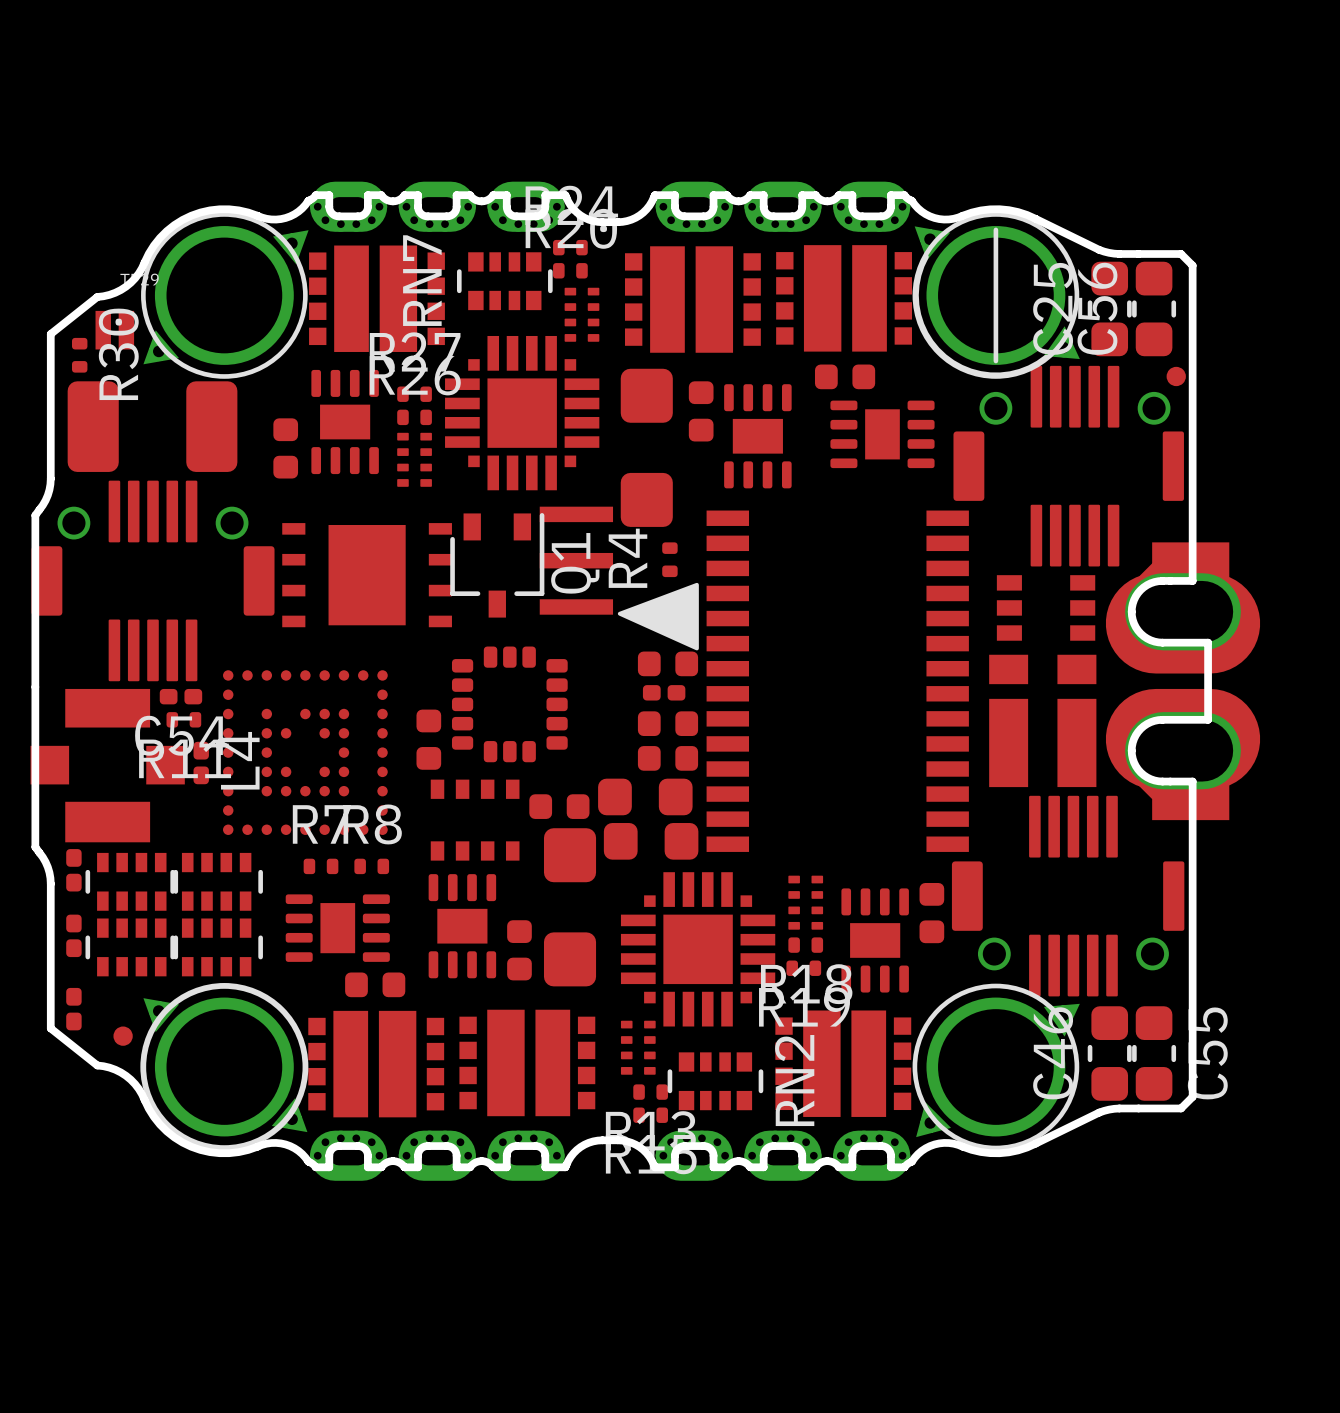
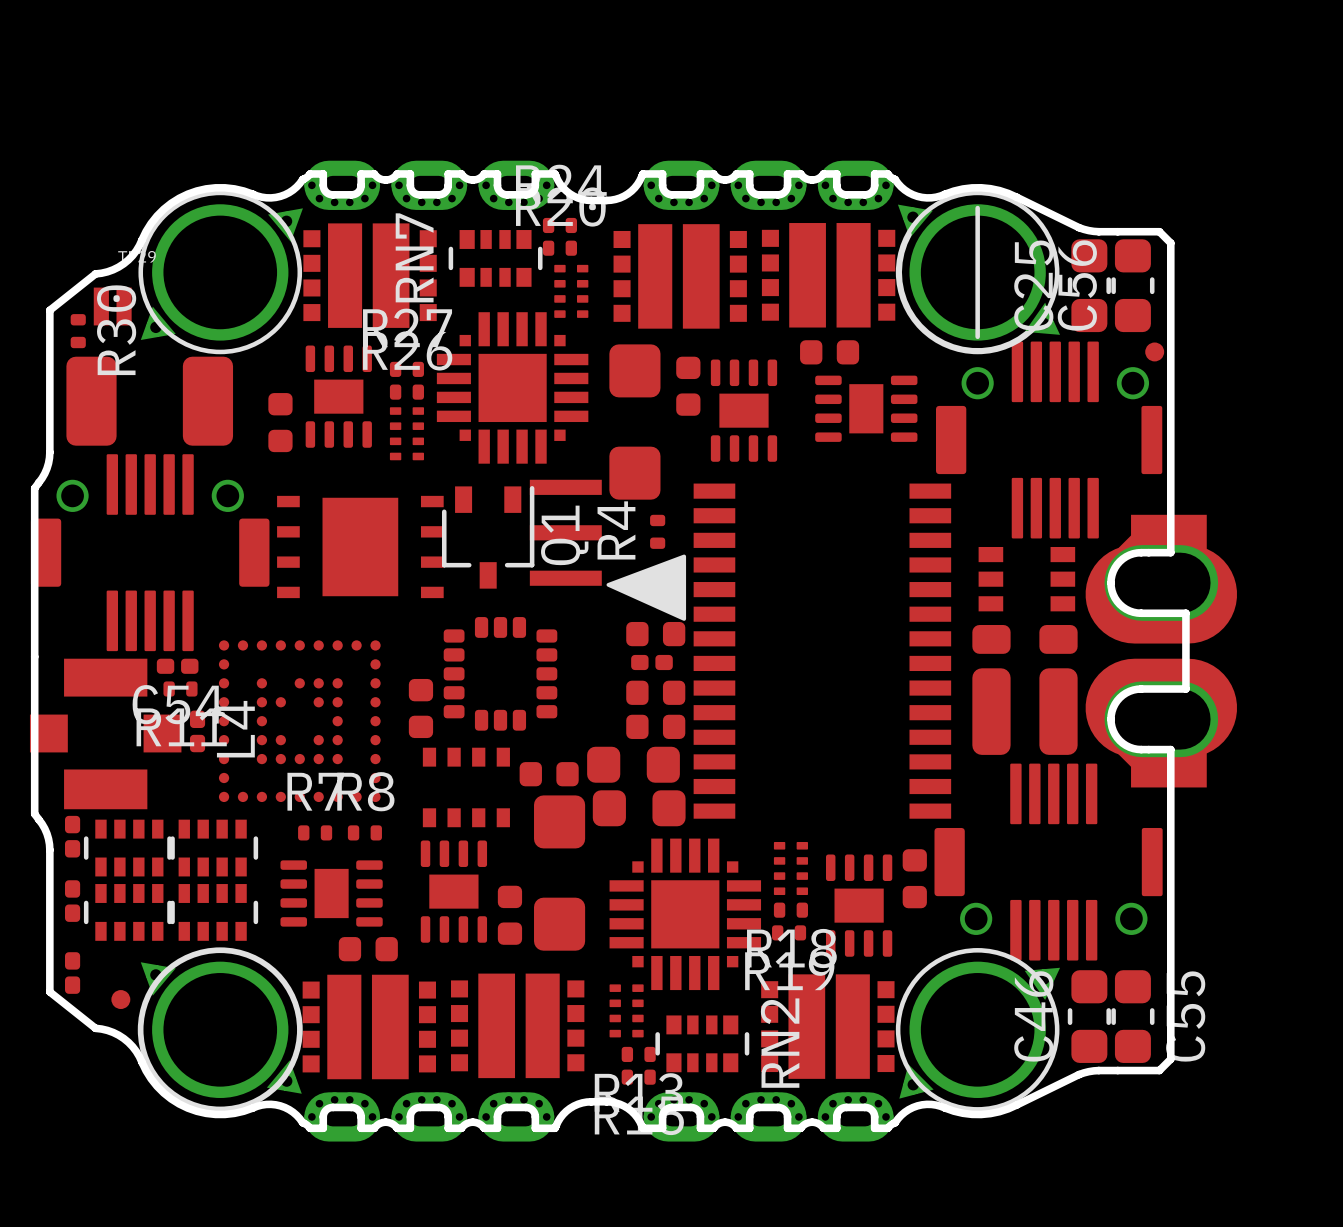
part footprint: [989, 654, 1097, 788] -> [972, 625, 1078, 755]

